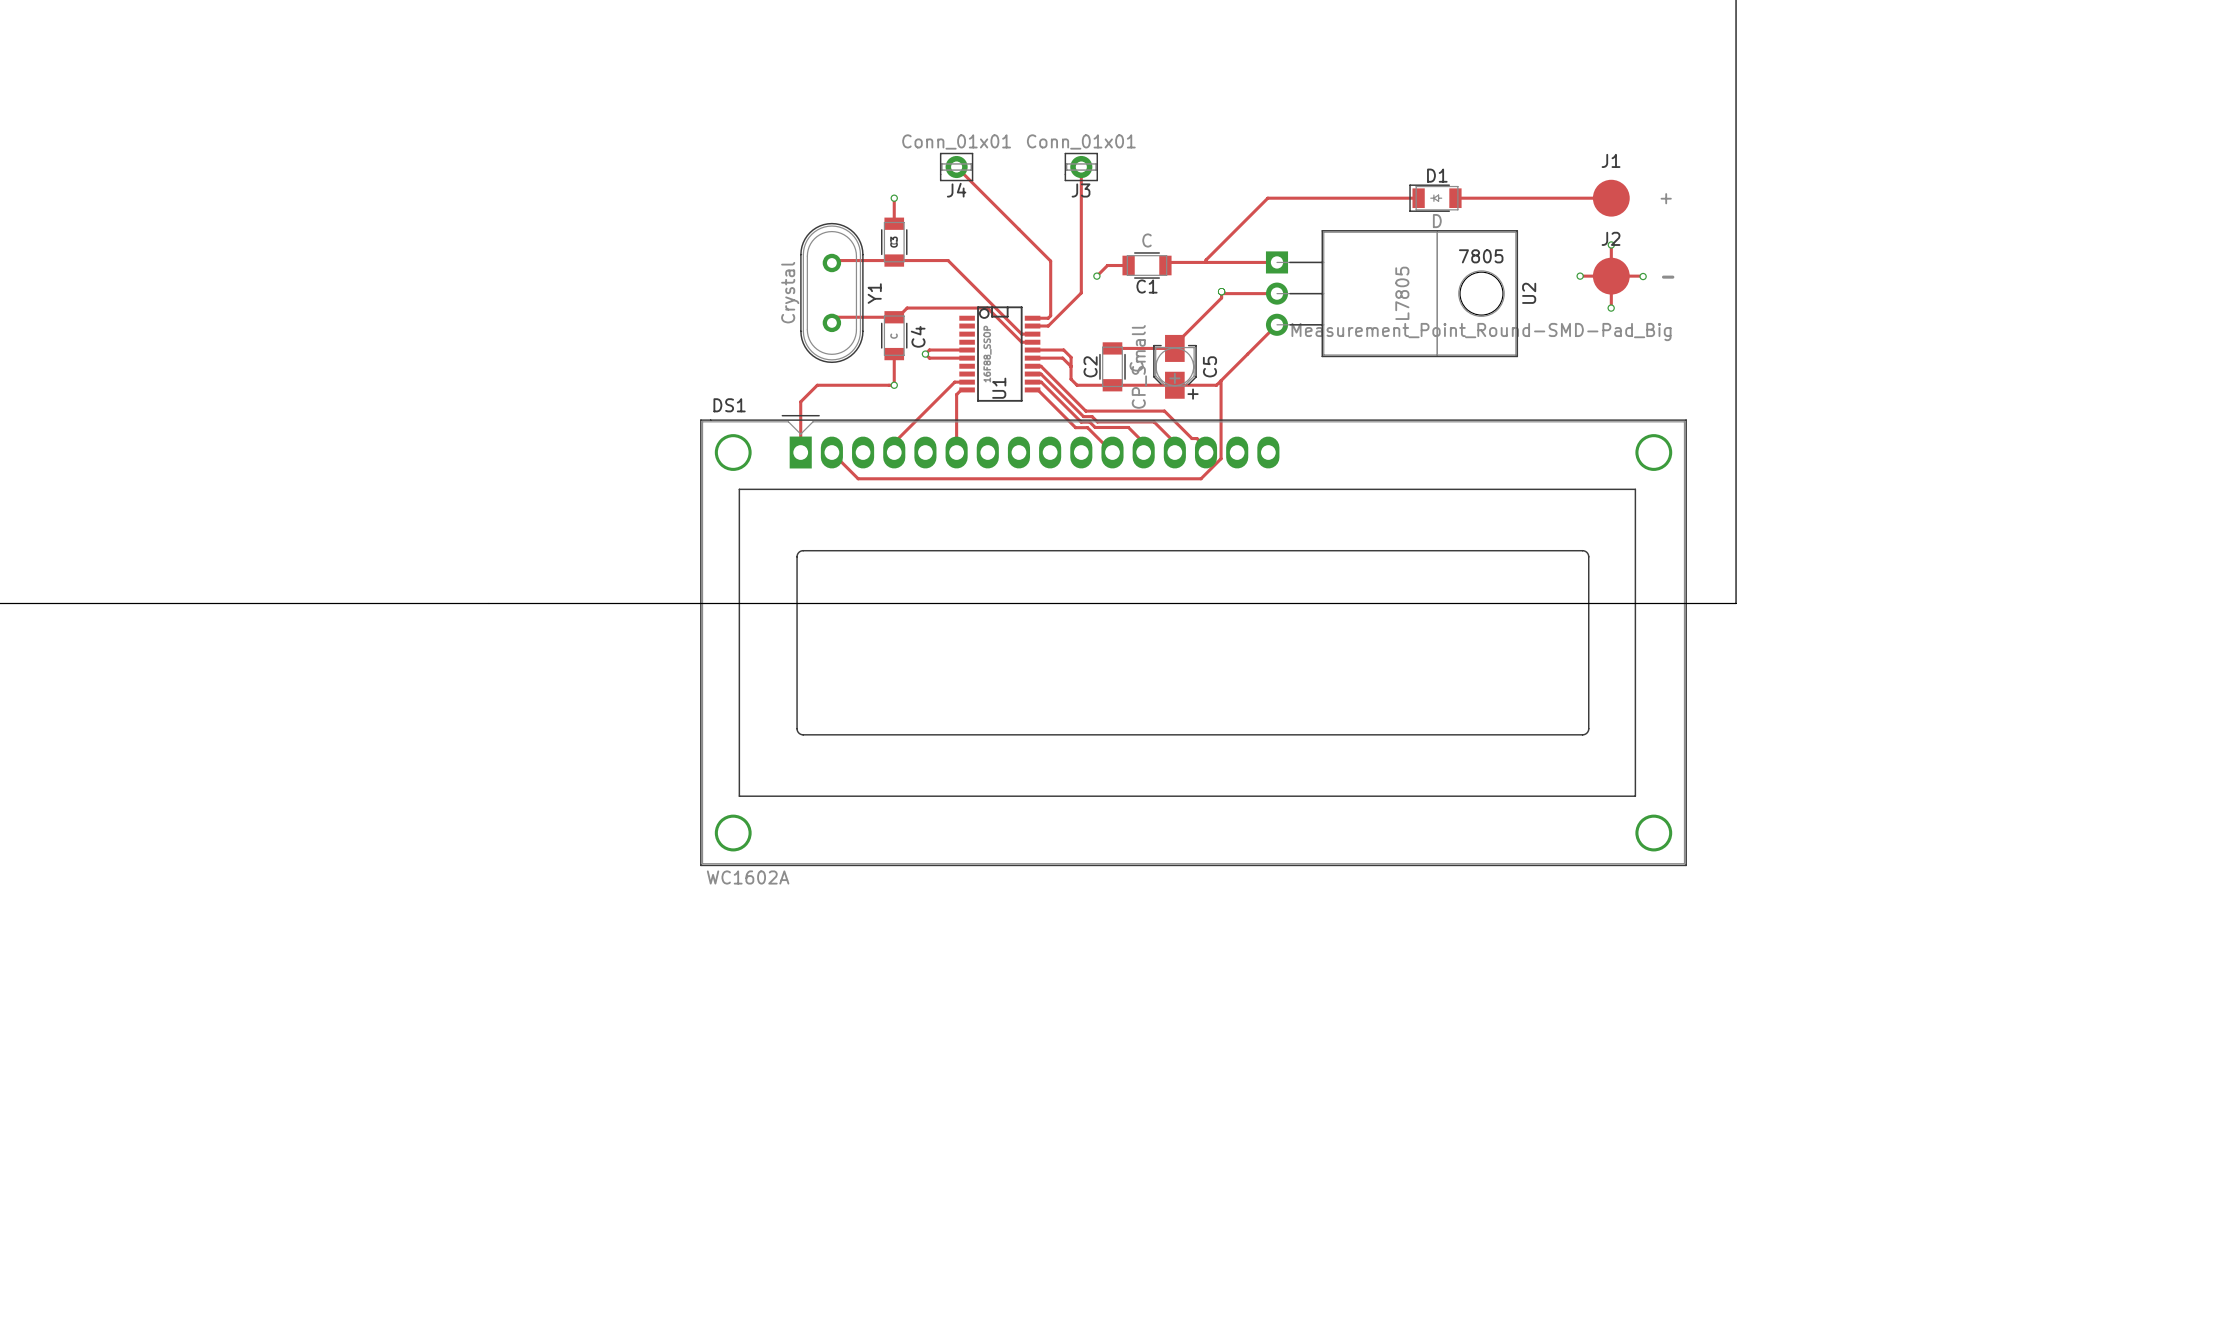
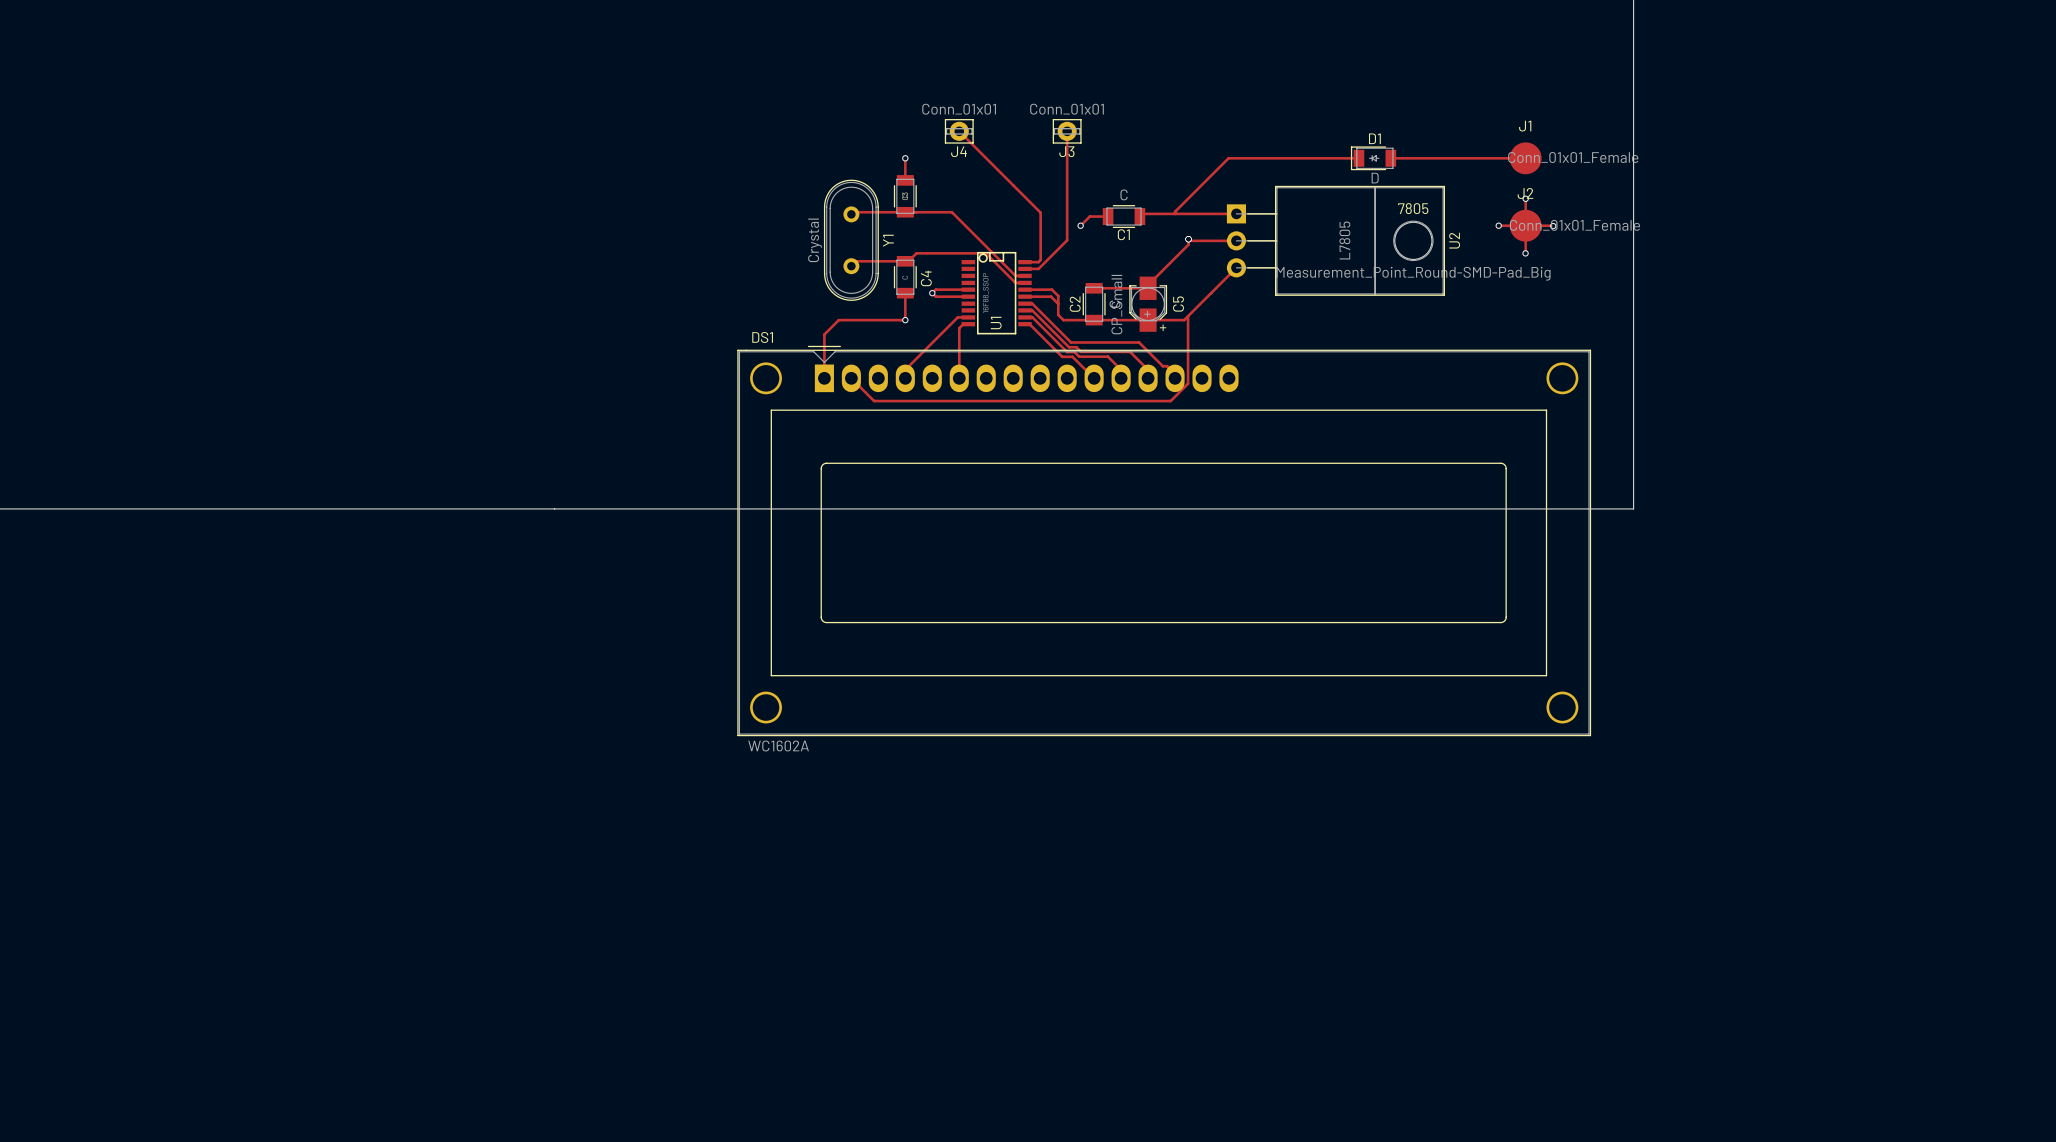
J1 value: + (1666, 198) -> Conn_01x01_Female (1573, 157)
J2 value: - (1668, 277) -> Conn_01x01_Female (1574, 225)

